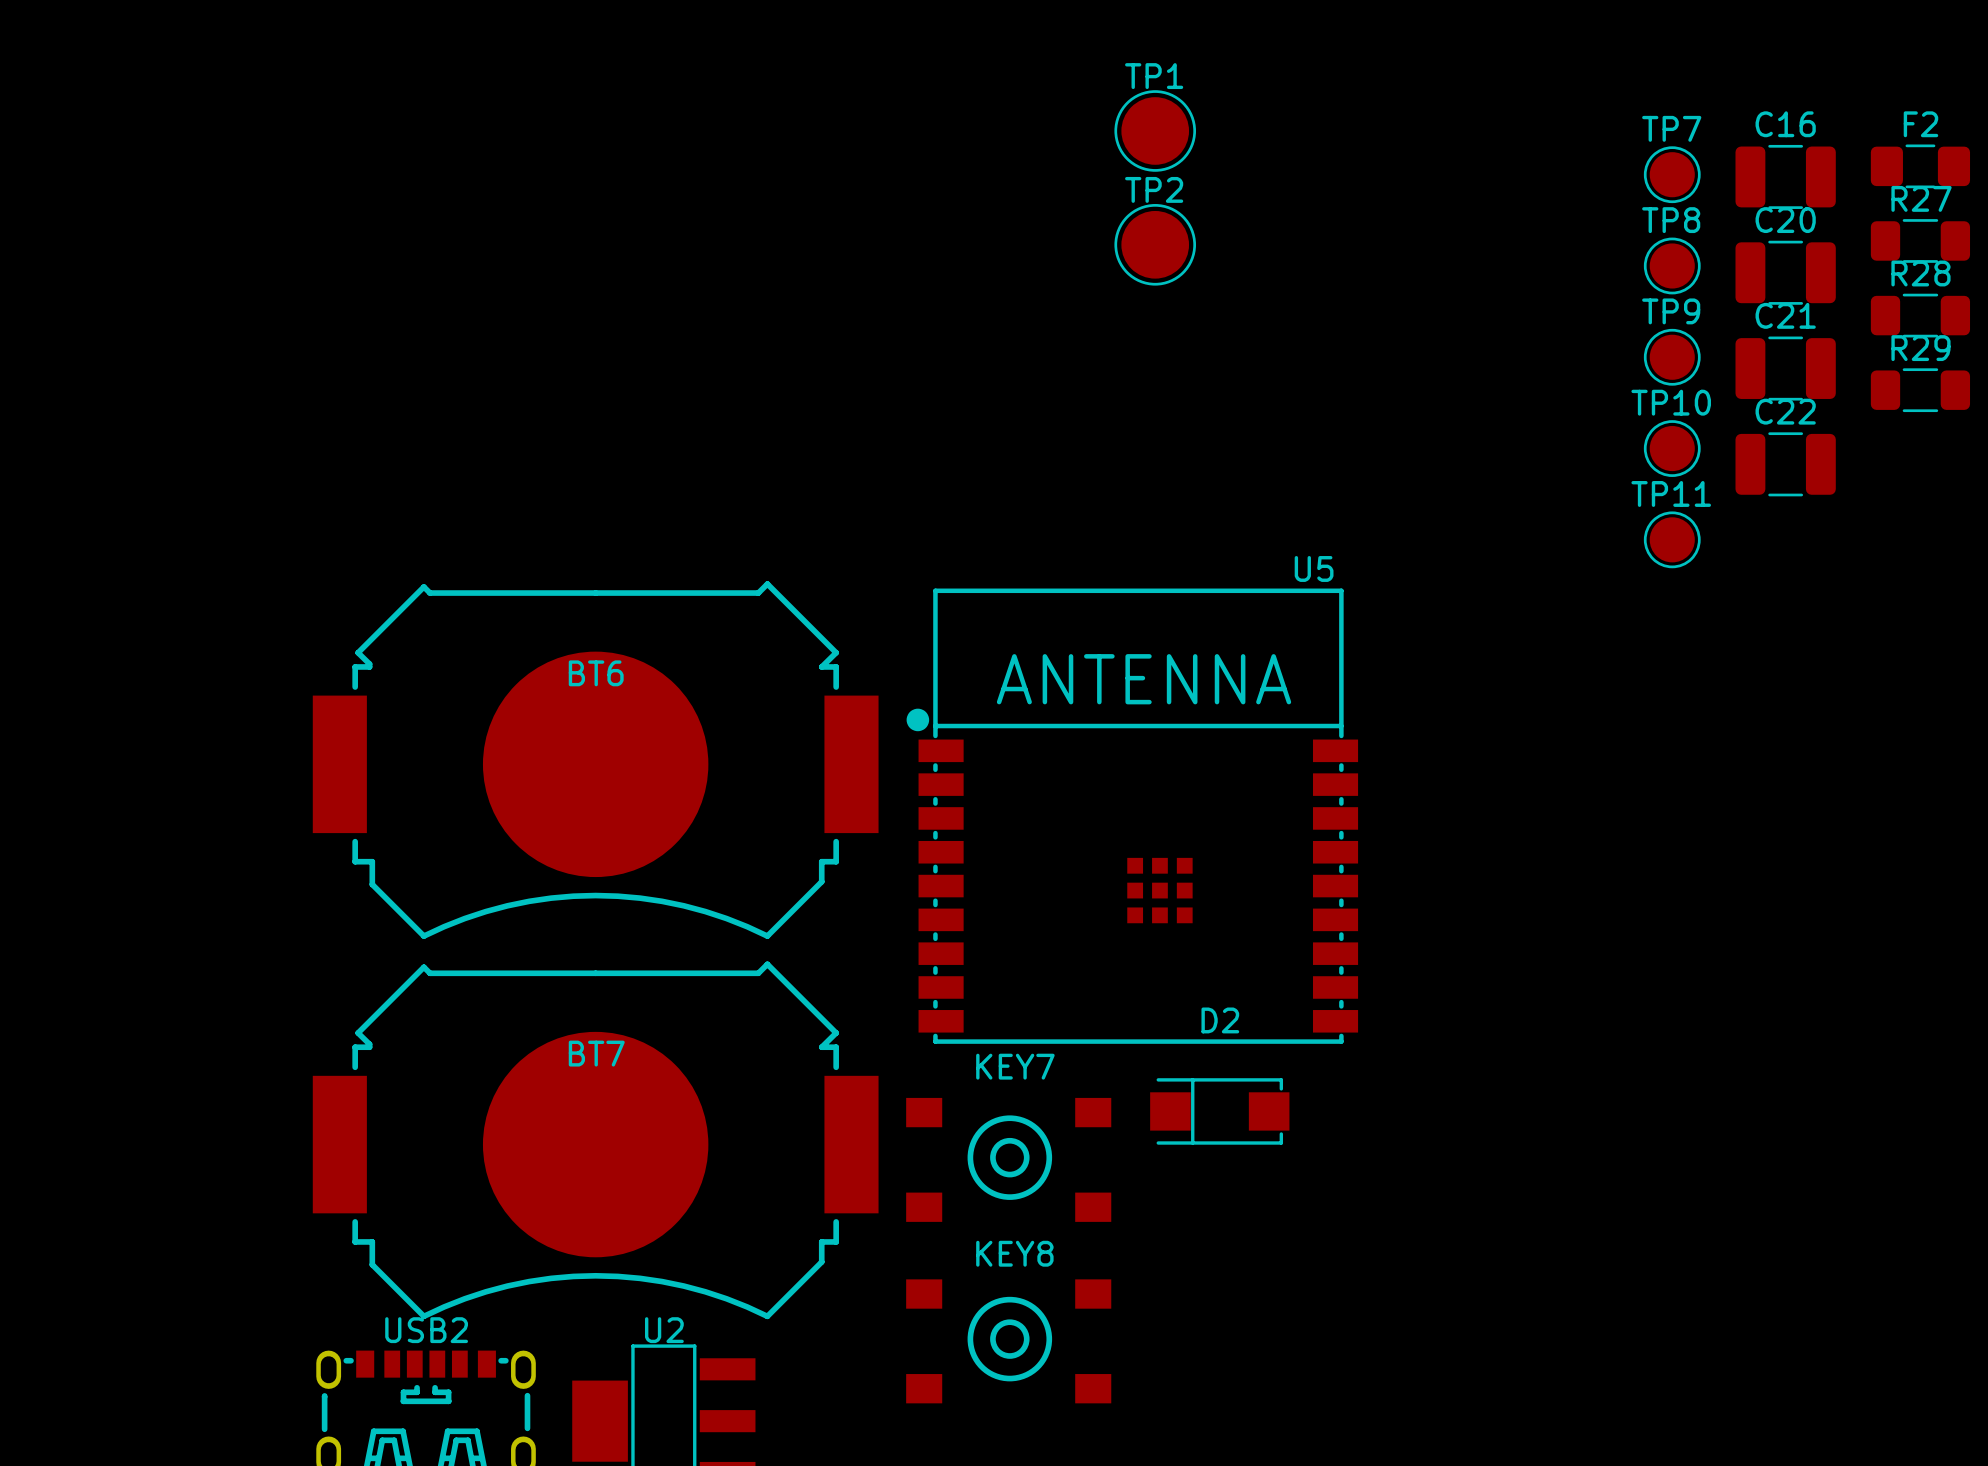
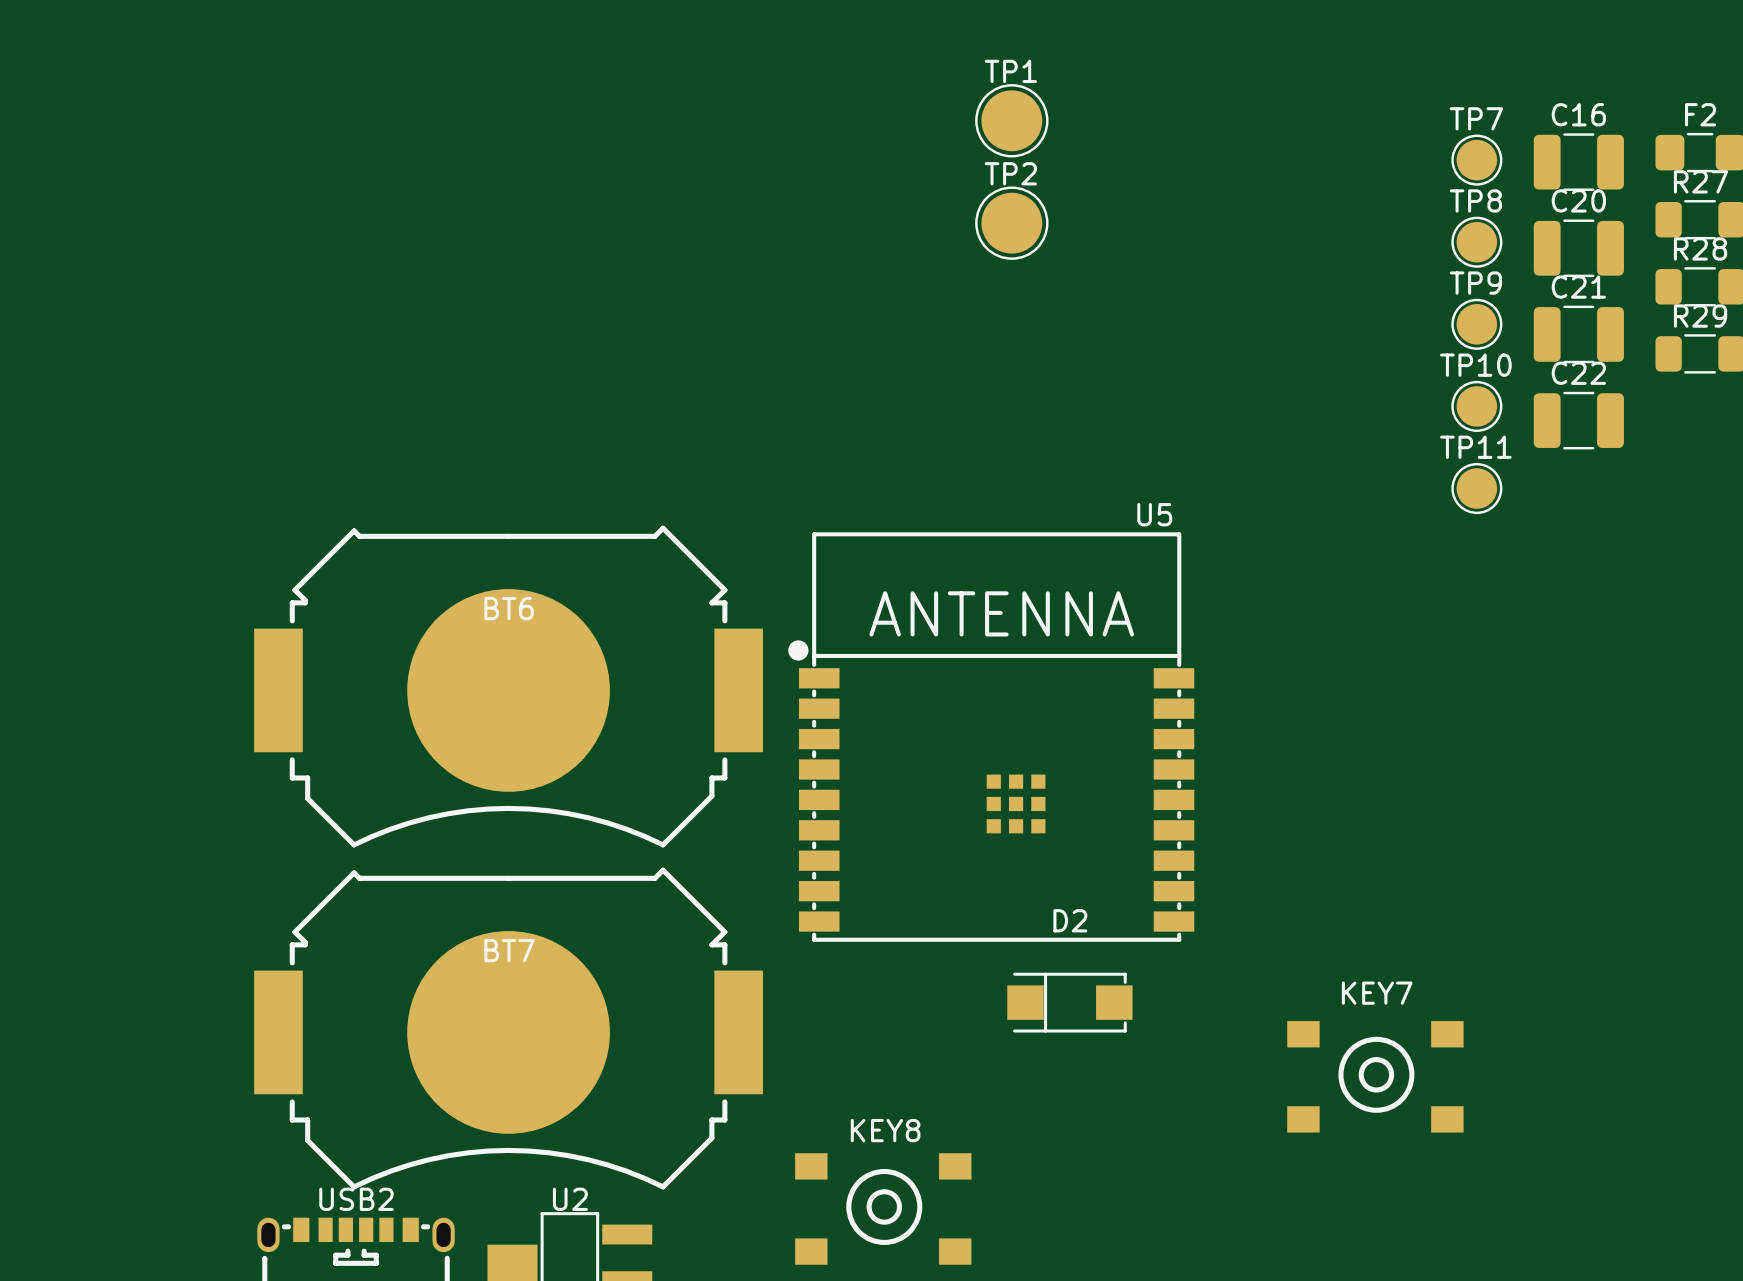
KEY7 footprint: [906, 1097, 1112, 1222] -> [1287, 1021, 1464, 1133]
KEY8 footprint: [906, 1279, 1112, 1404] -> [795, 1153, 972, 1265]

